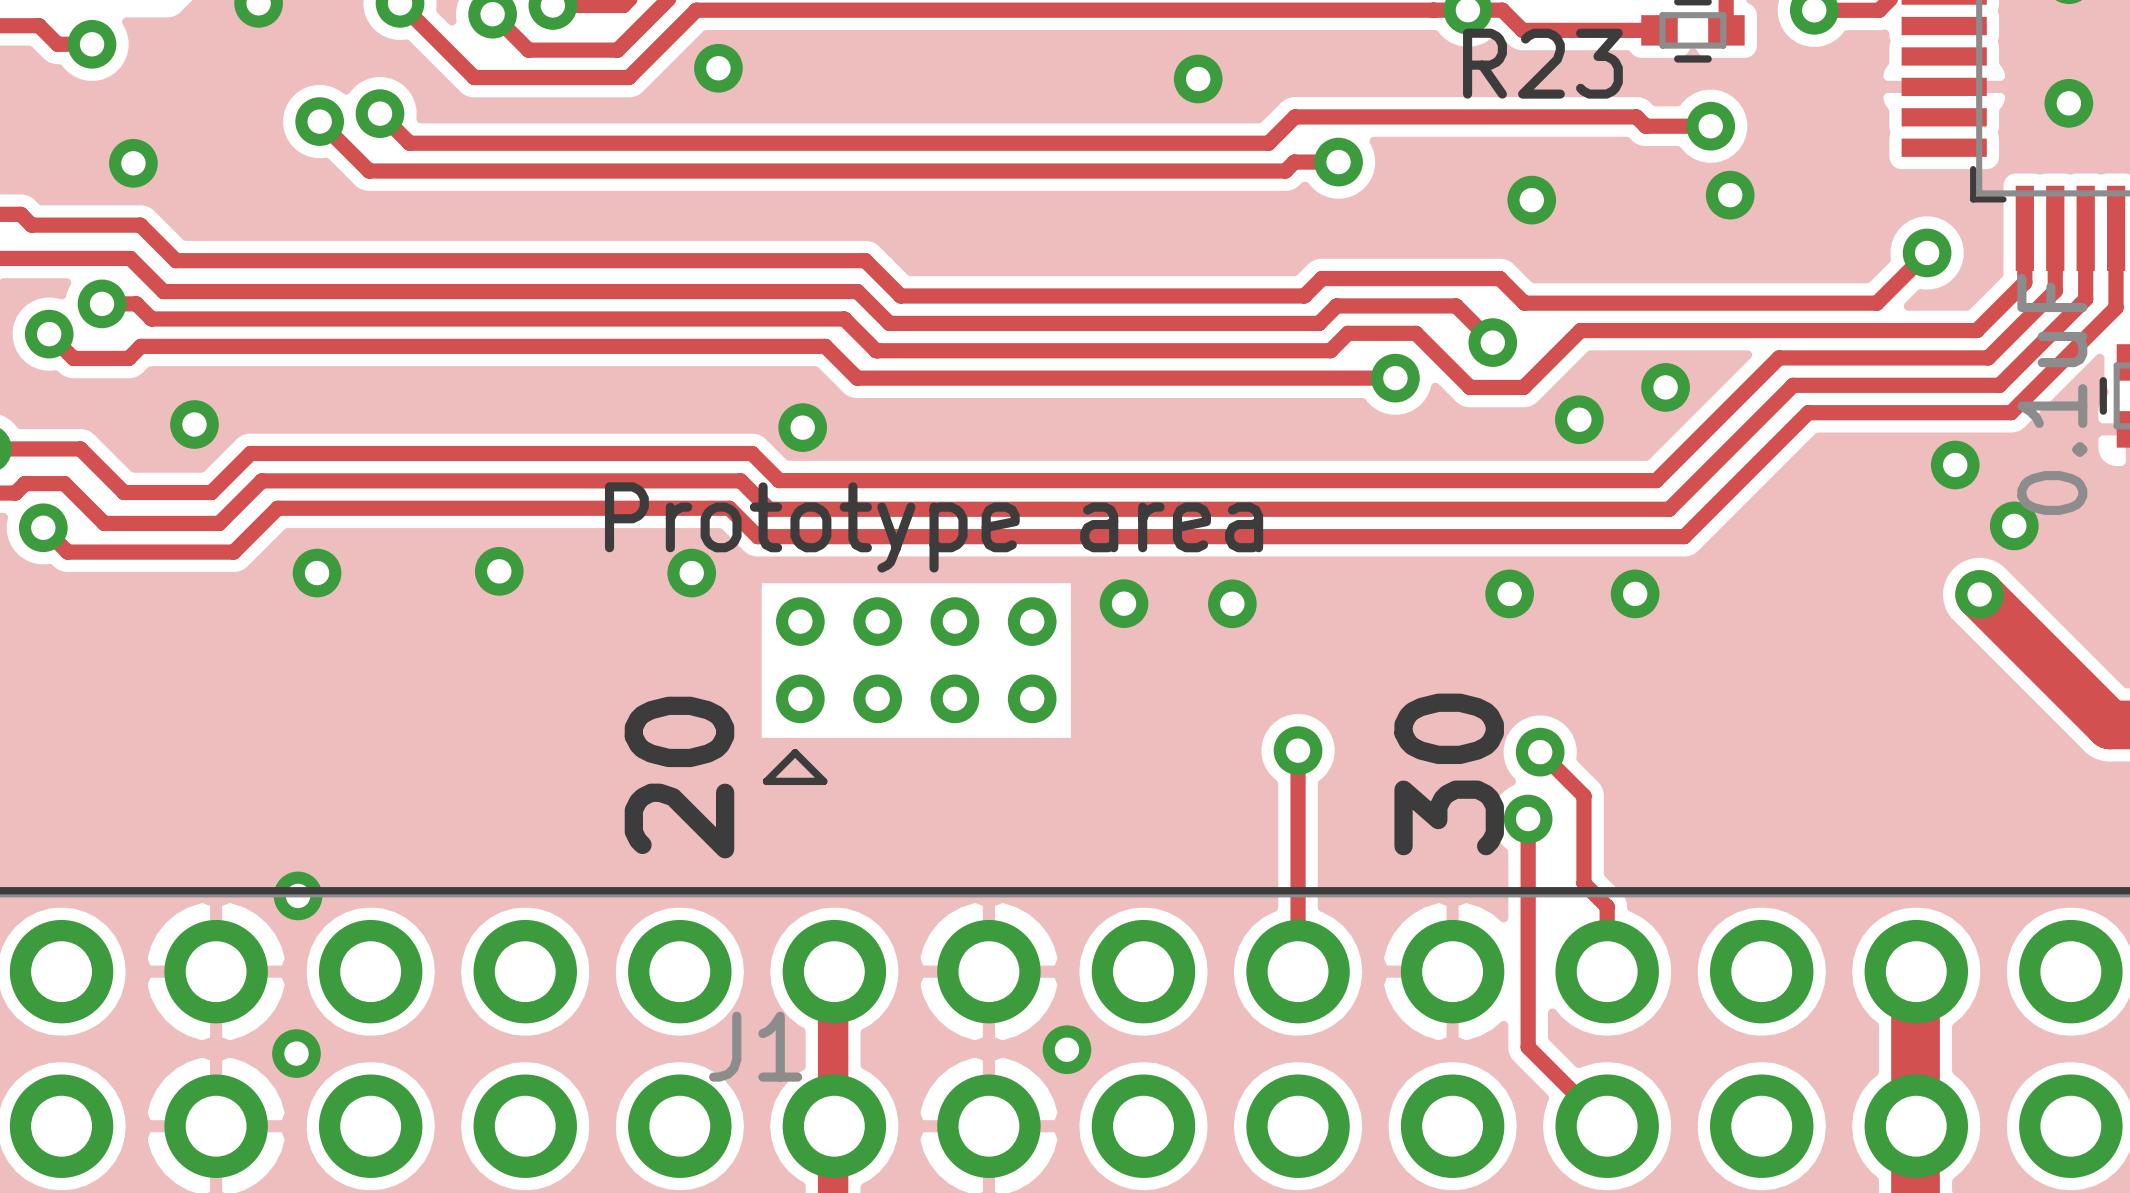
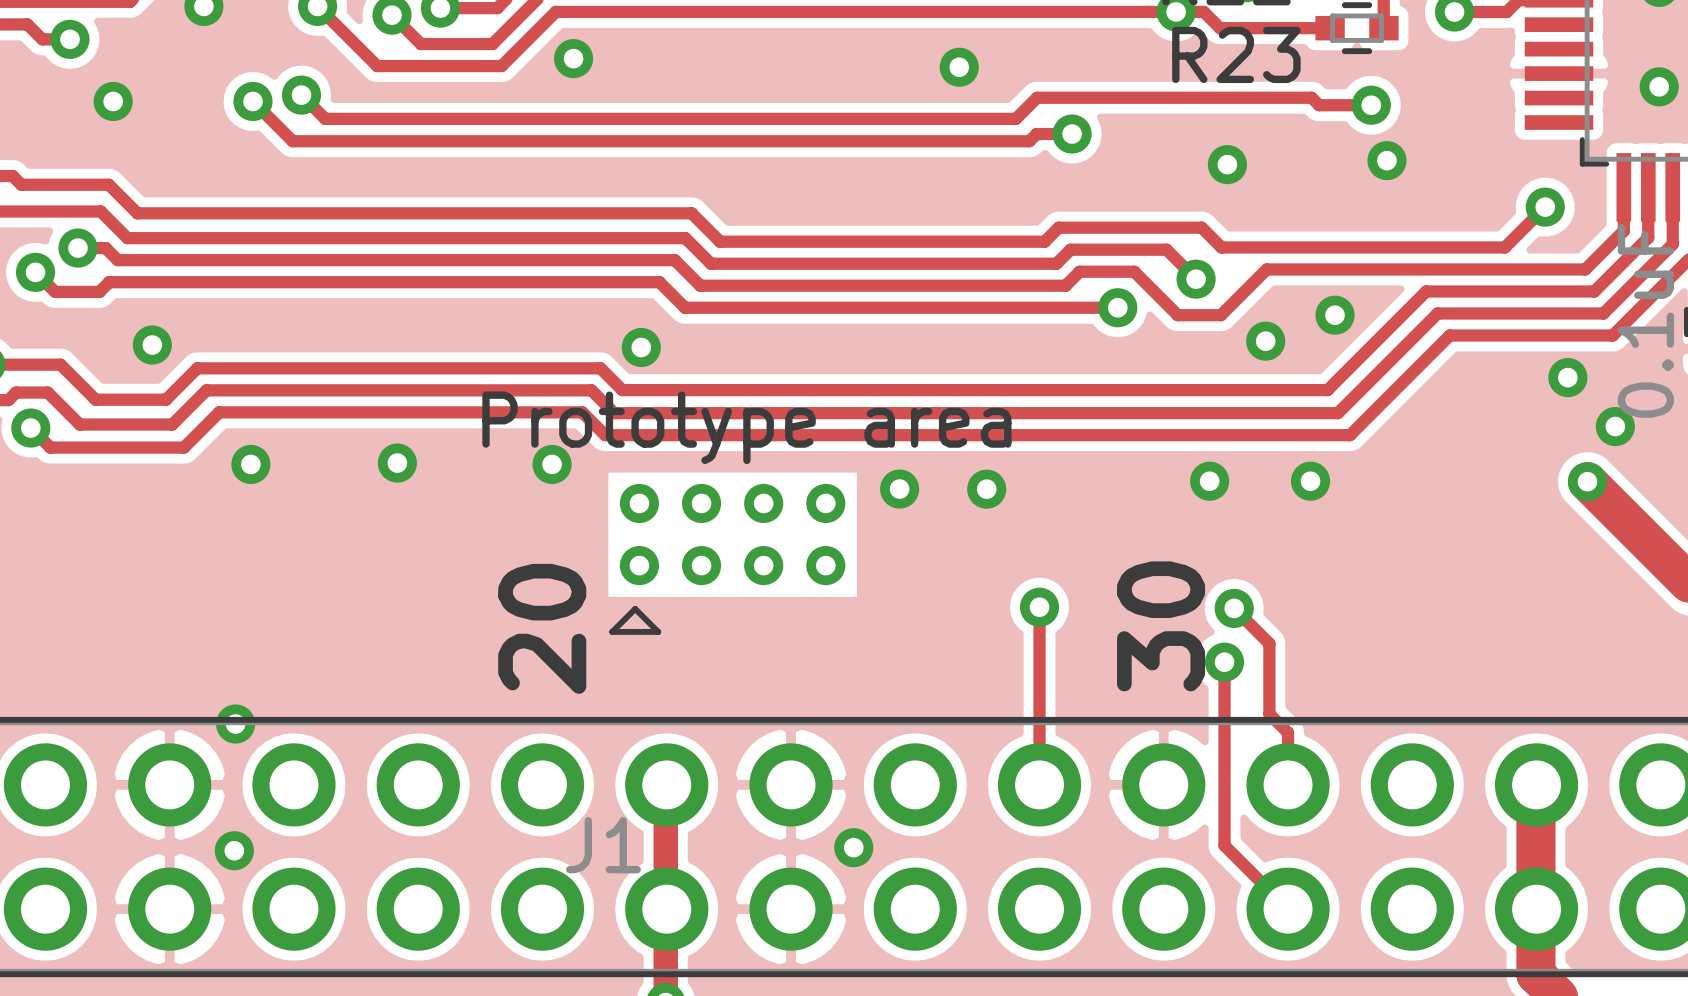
via position: (133, 163) -> (113, 101)

